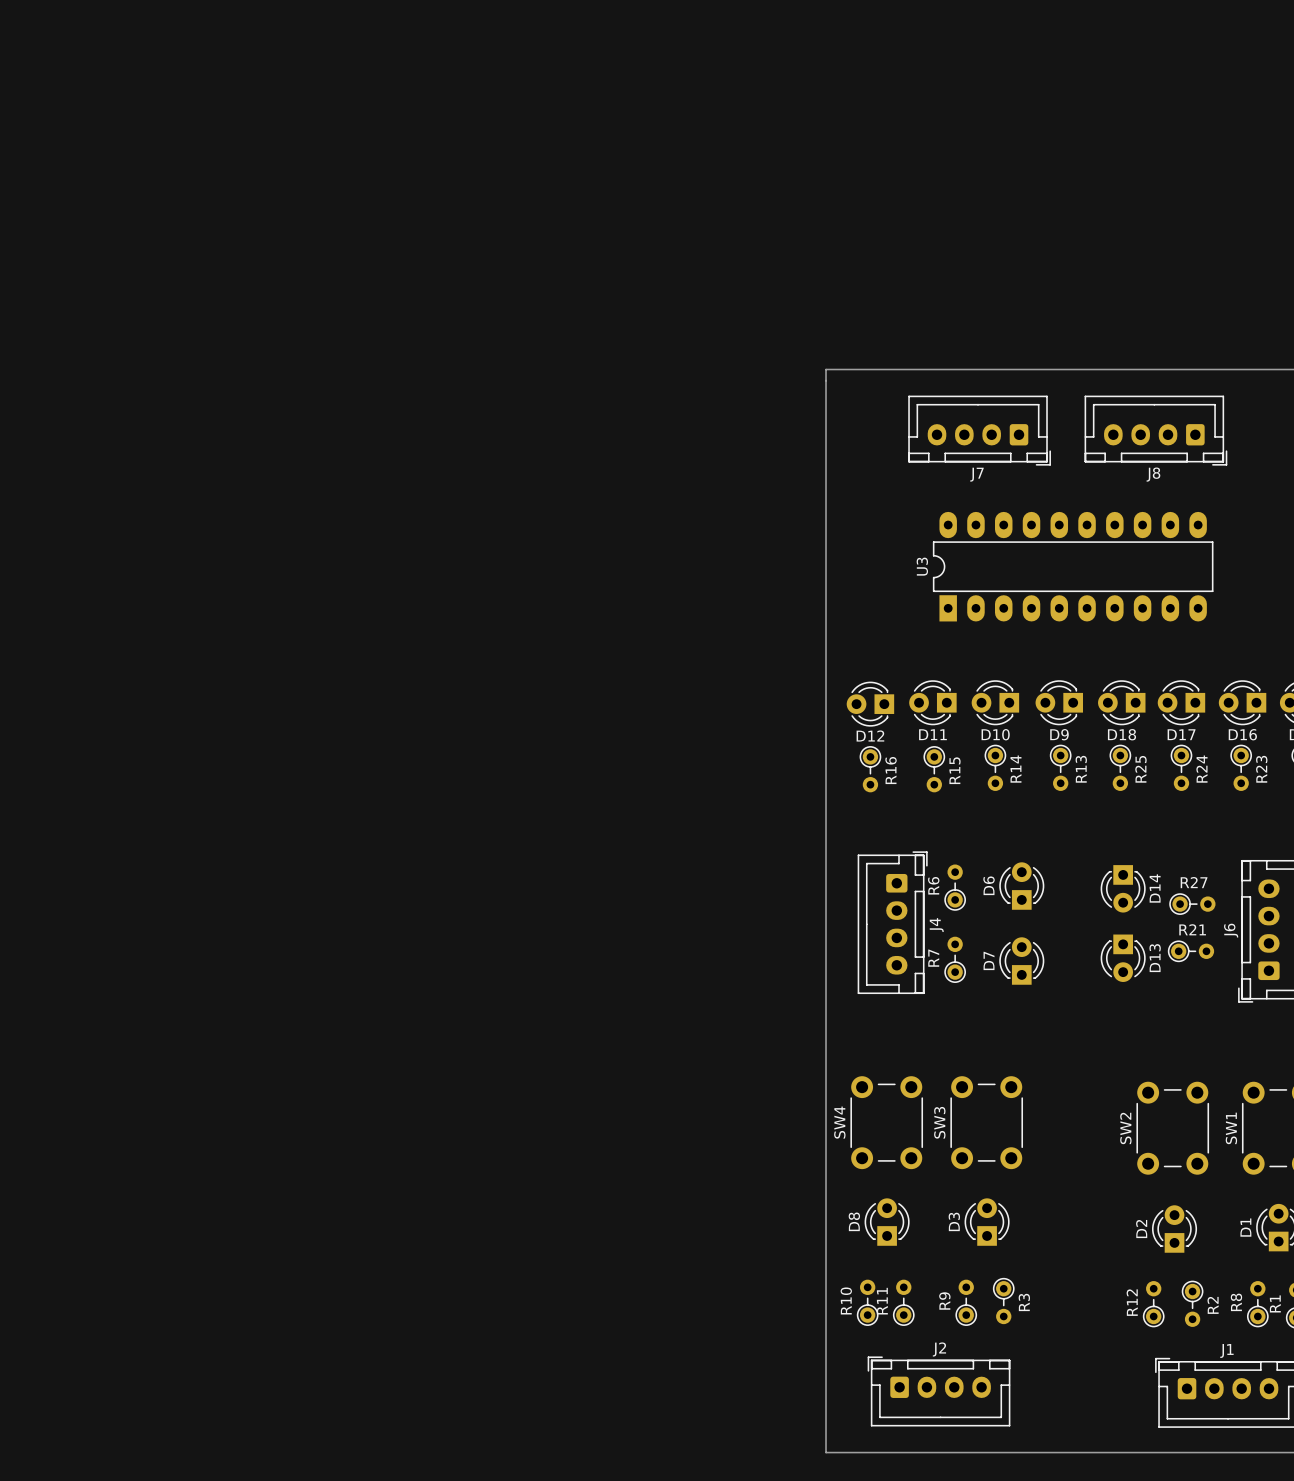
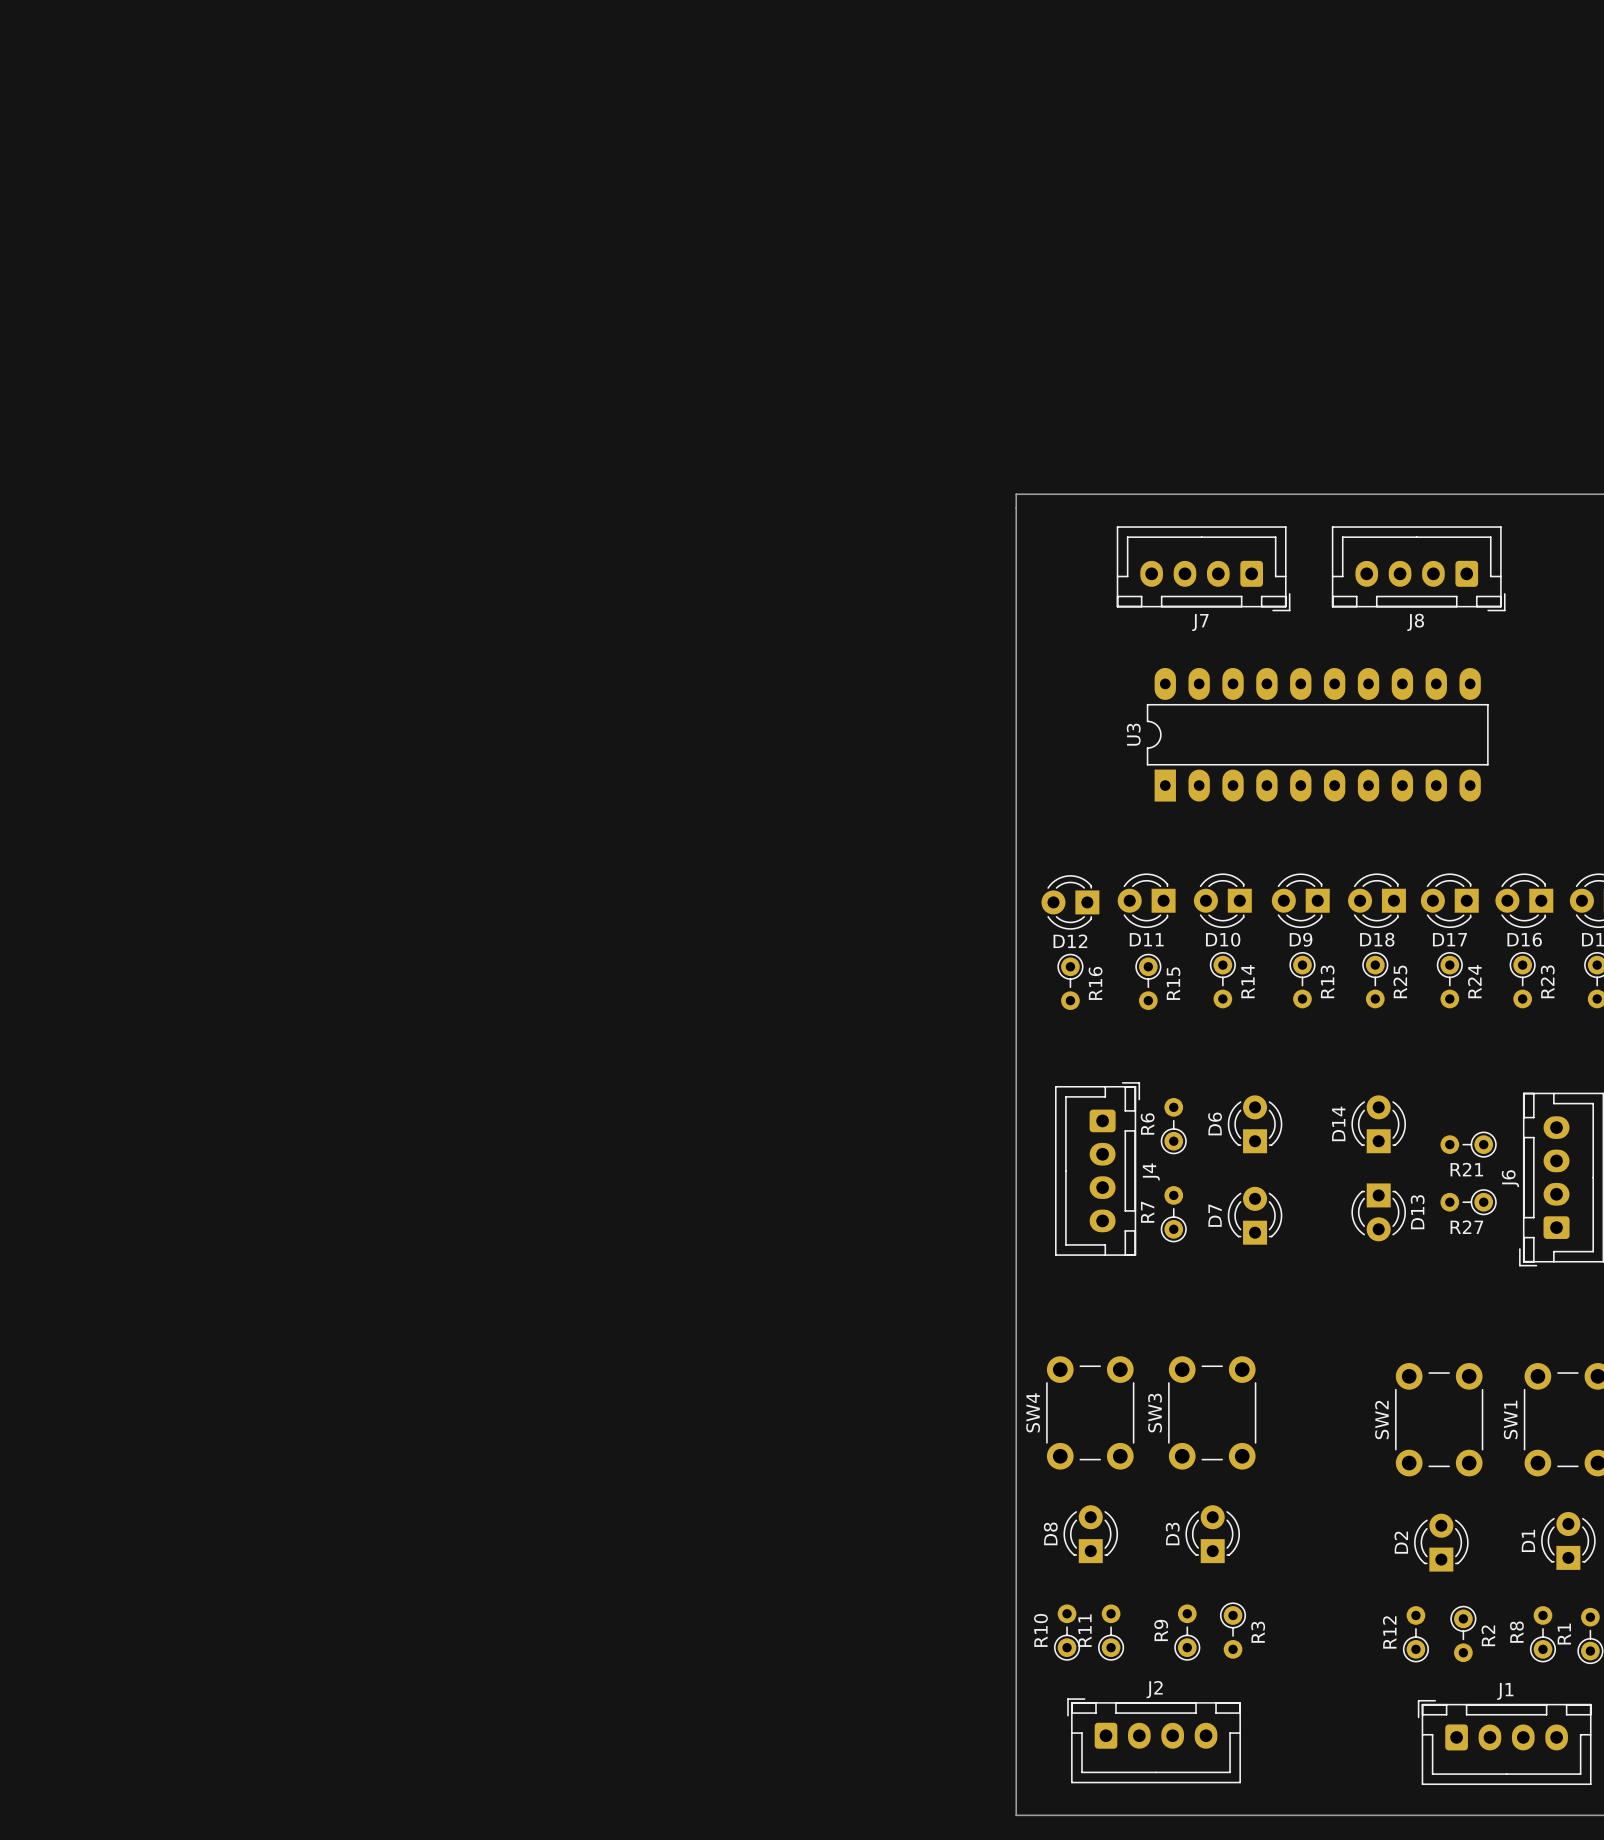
D14 rotation: 0° (1123, 888) -> 180° (1378, 1124)
R27 rotation: 0° (1192, 904) -> 180° (1468, 1202)
R27 position: (1192, 904) -> (1468, 1202)
R21 rotation: 0° (1191, 951) -> 180° (1468, 1144)
R21 position: (1191, 951) -> (1468, 1144)

